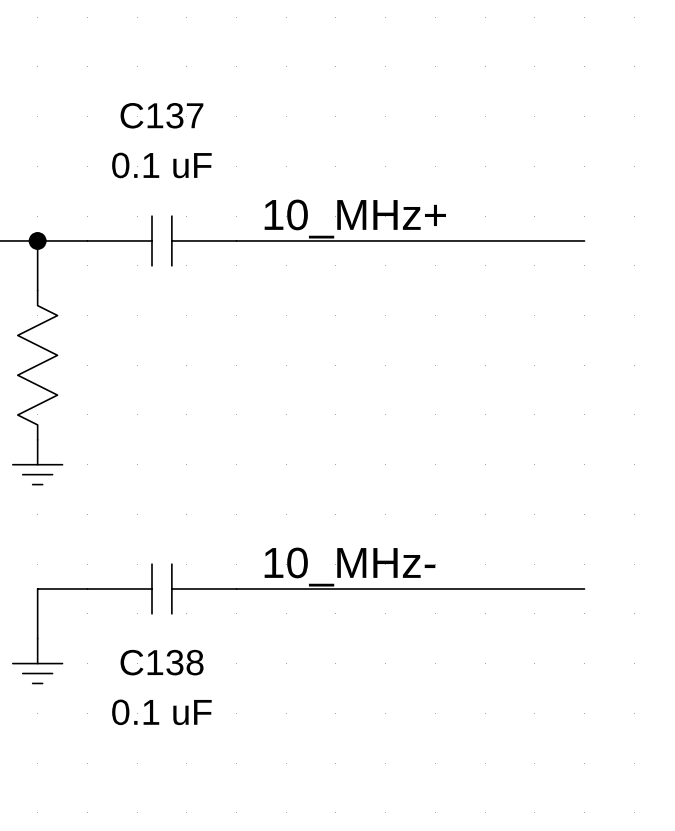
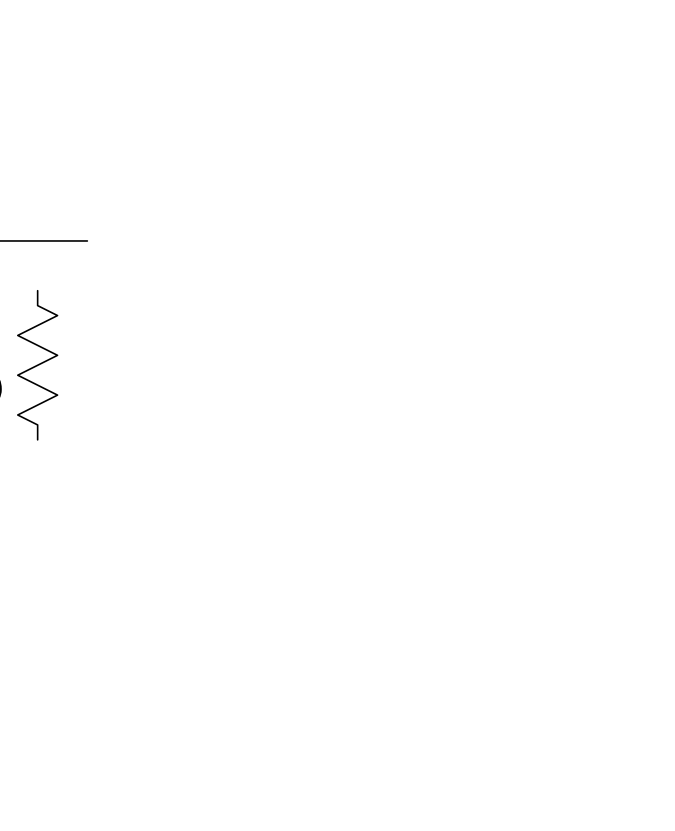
label: 10_MHz+ (355, 219) -> none
wire: (37, 240) (37, 290) -> none
junction: (37, 240) -> none
C137: 0.1 uF (161, 240) -> none
wire: (236, 240) (584, 240) -> none
power symbol: (37, 462) -> none
label: 10_MHz- (350, 567) -> none
wire: (87, 589) (37, 589) (37, 638) -> none
C138: 0.1 uF (161, 589) -> none
wire: (236, 589) (584, 589) -> none
power symbol: (37, 661) -> none

